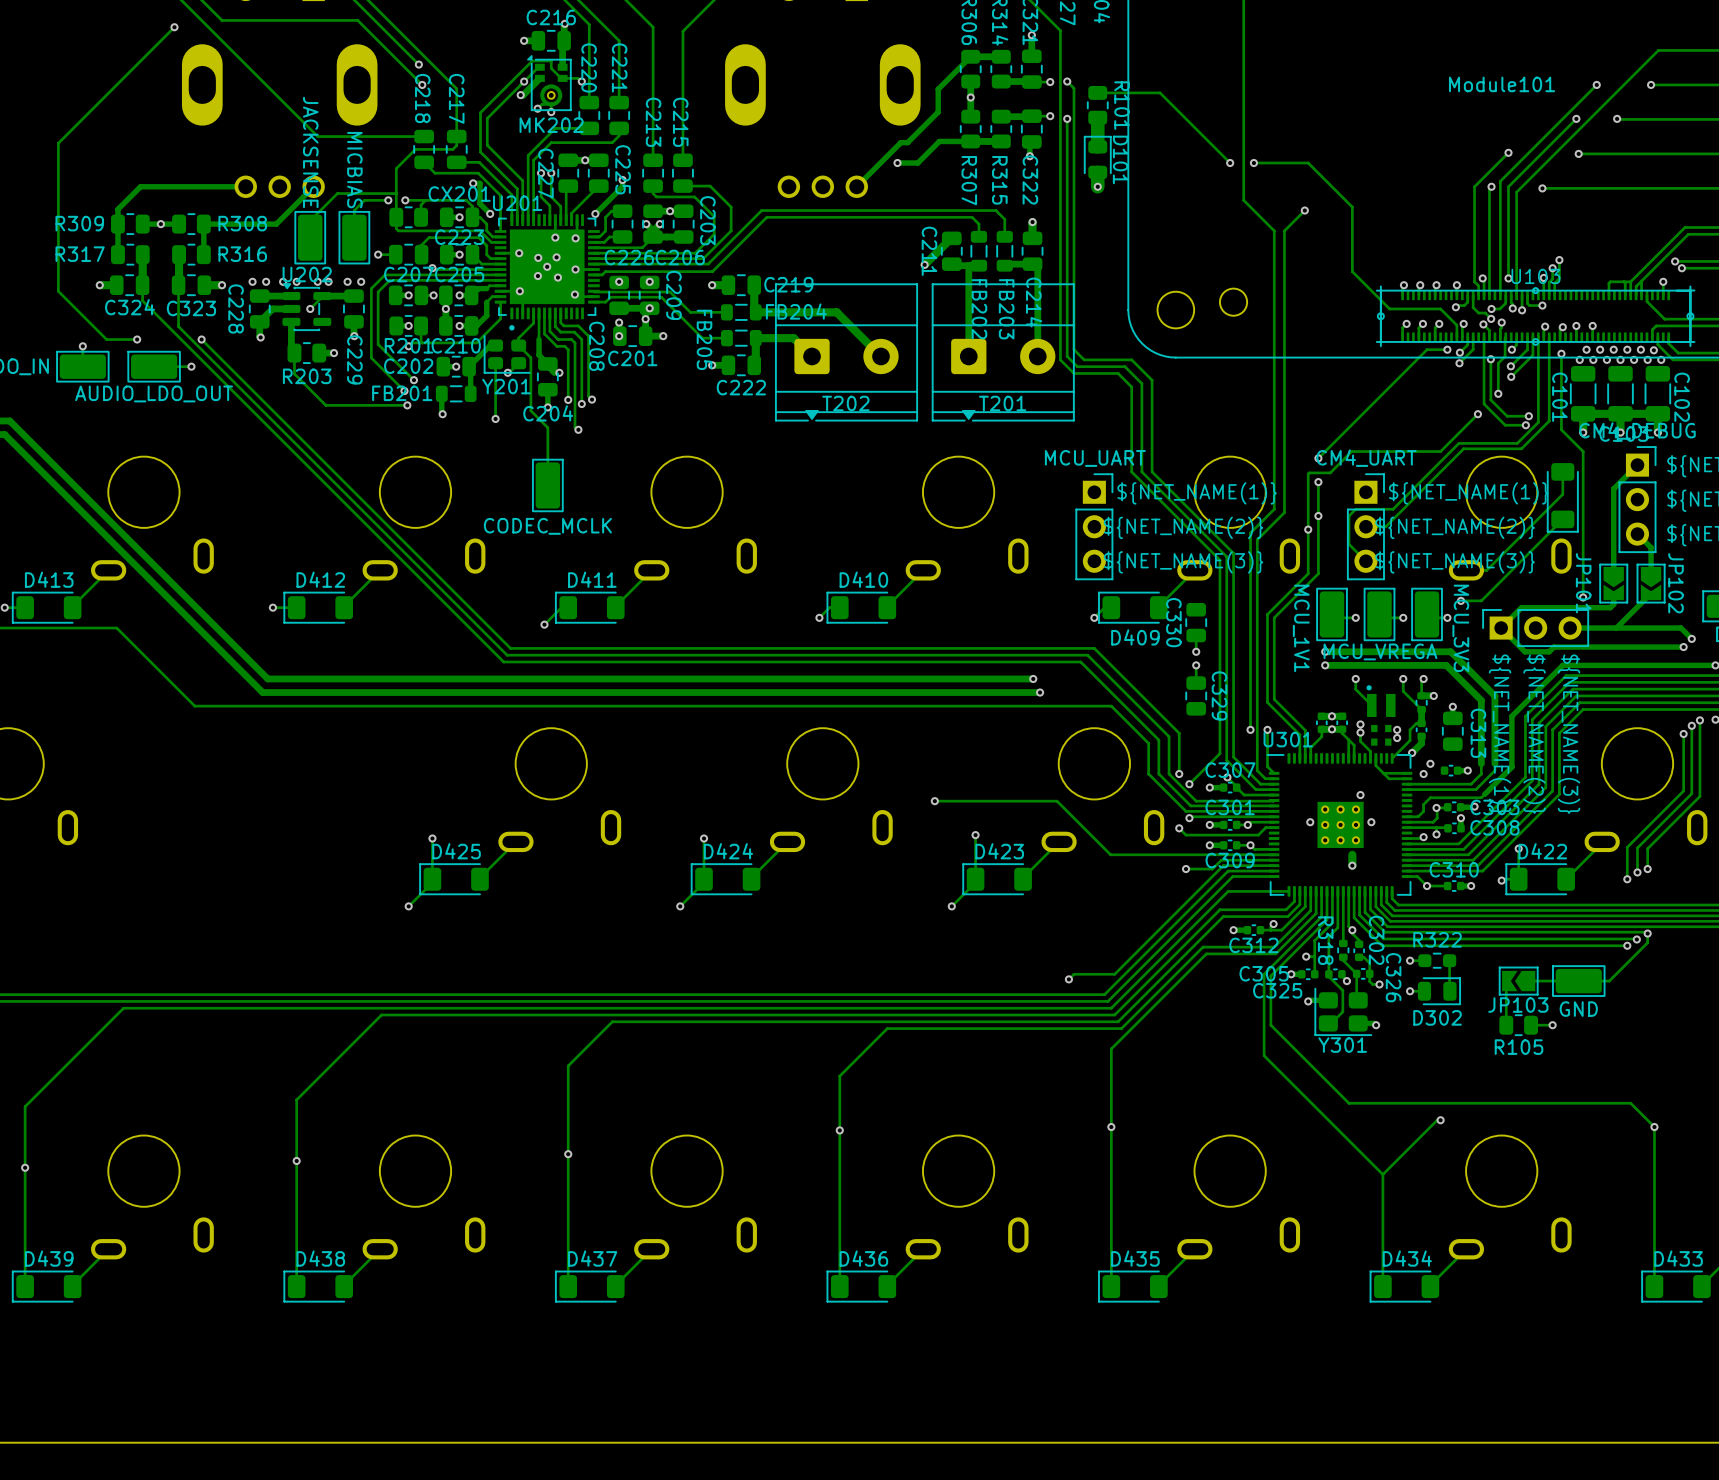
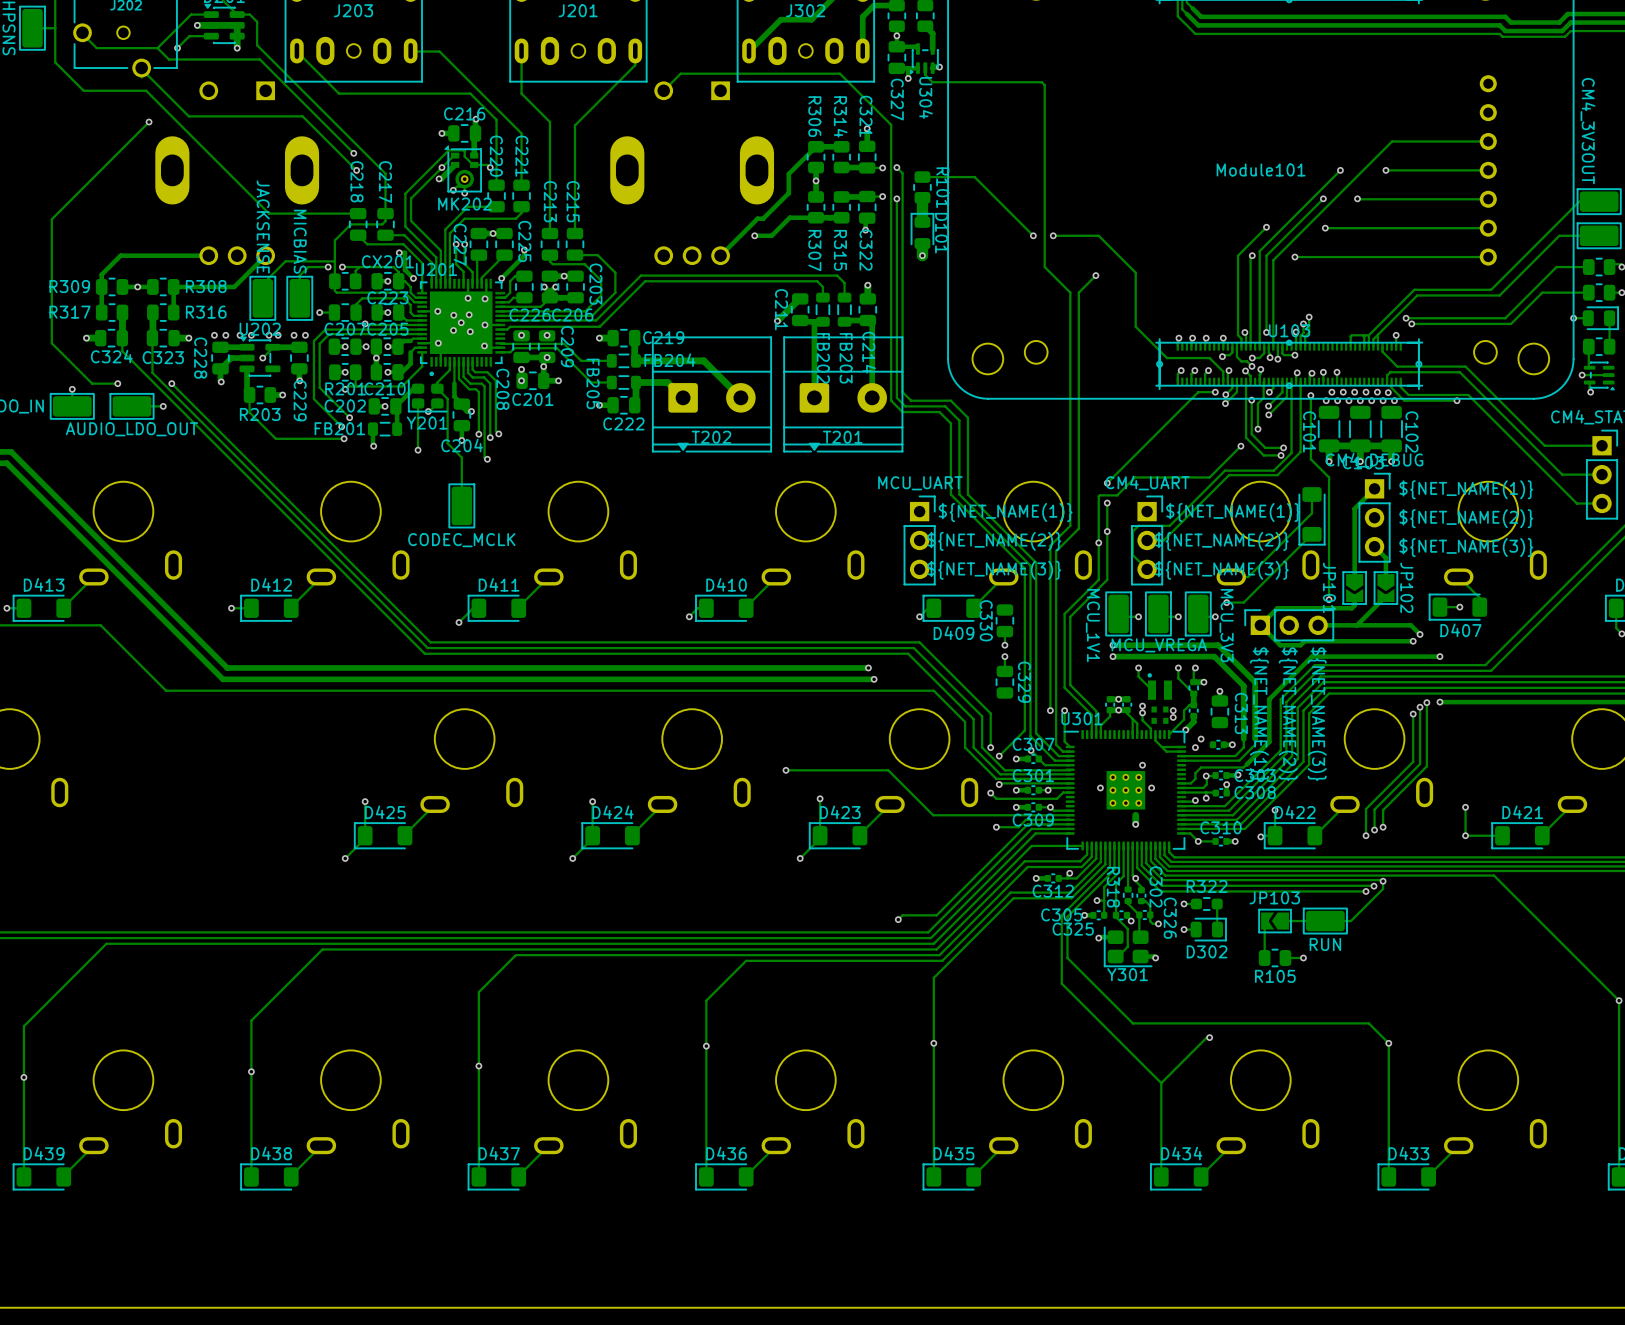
JP103 name position: JP103 (1518, 1005) -> JP103 (1274, 897)
part value: GND (1578, 1009) -> RUN (1325, 944)

